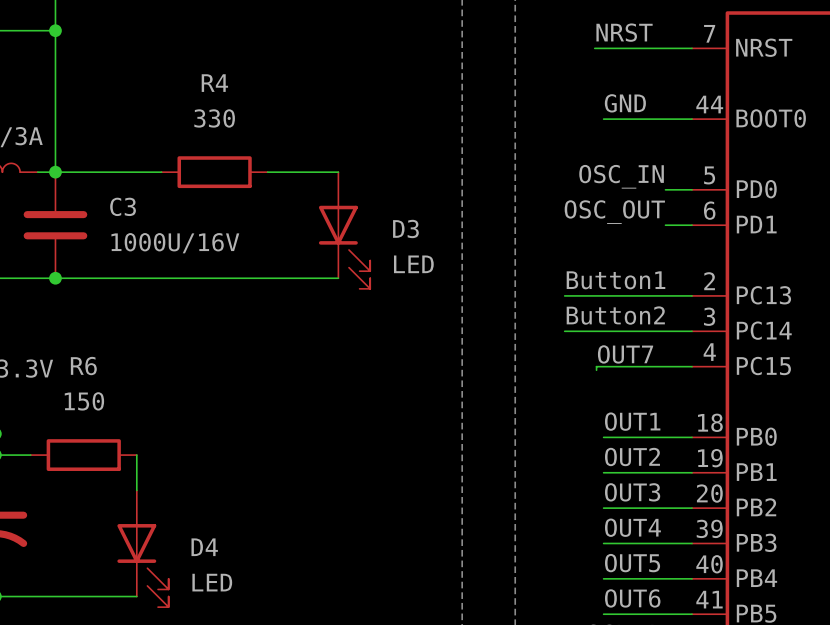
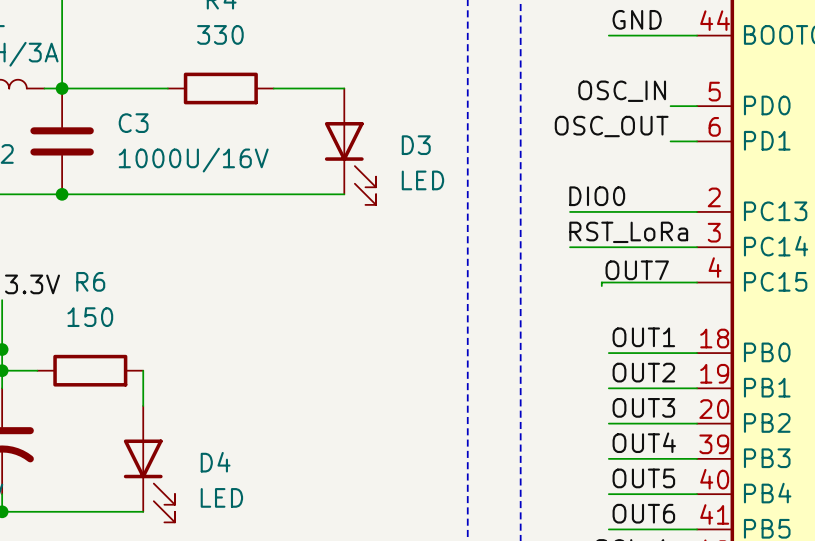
label: Button1 (615, 280) -> DIO0 (597, 196)
label: Button2 (615, 315) -> RST_LoRa (628, 232)

